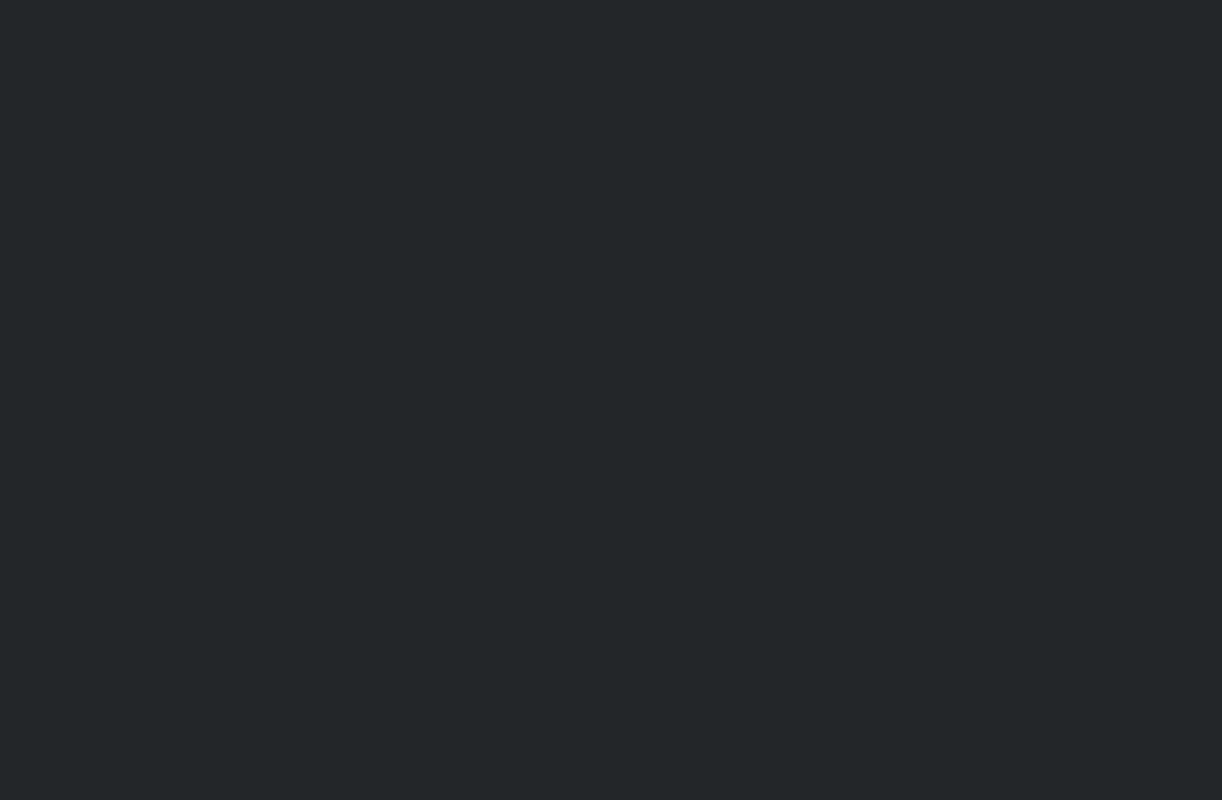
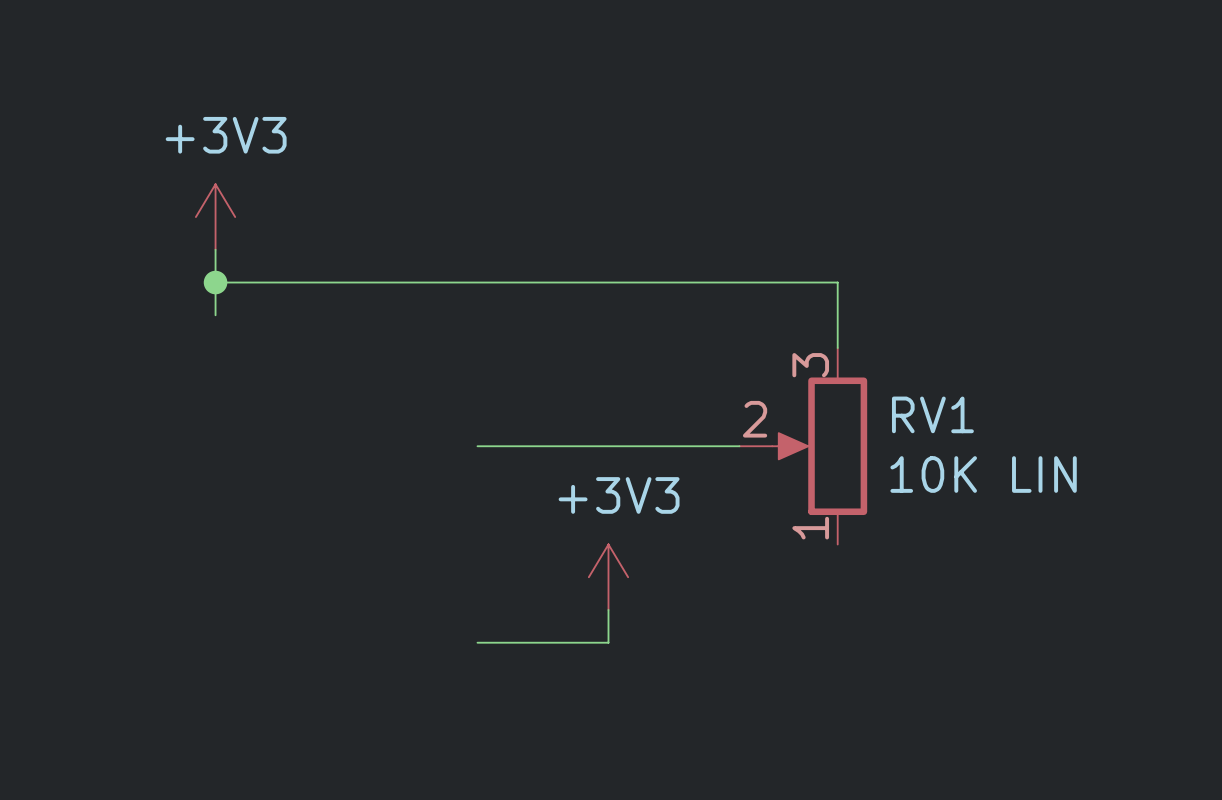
power symbol: none -> +3V3 (215, 217)
wire: none -> (215, 249) (215, 315)
wire: none -> (215, 282) (837, 282) (837, 348)
junction: none -> (215, 282)
wire: none -> (477, 446) (739, 446)
RV1: none -> 10K LIN (803, 446)
power symbol: none -> +3V3 (608, 577)
wire: none -> (608, 609) (608, 642) (477, 642)

